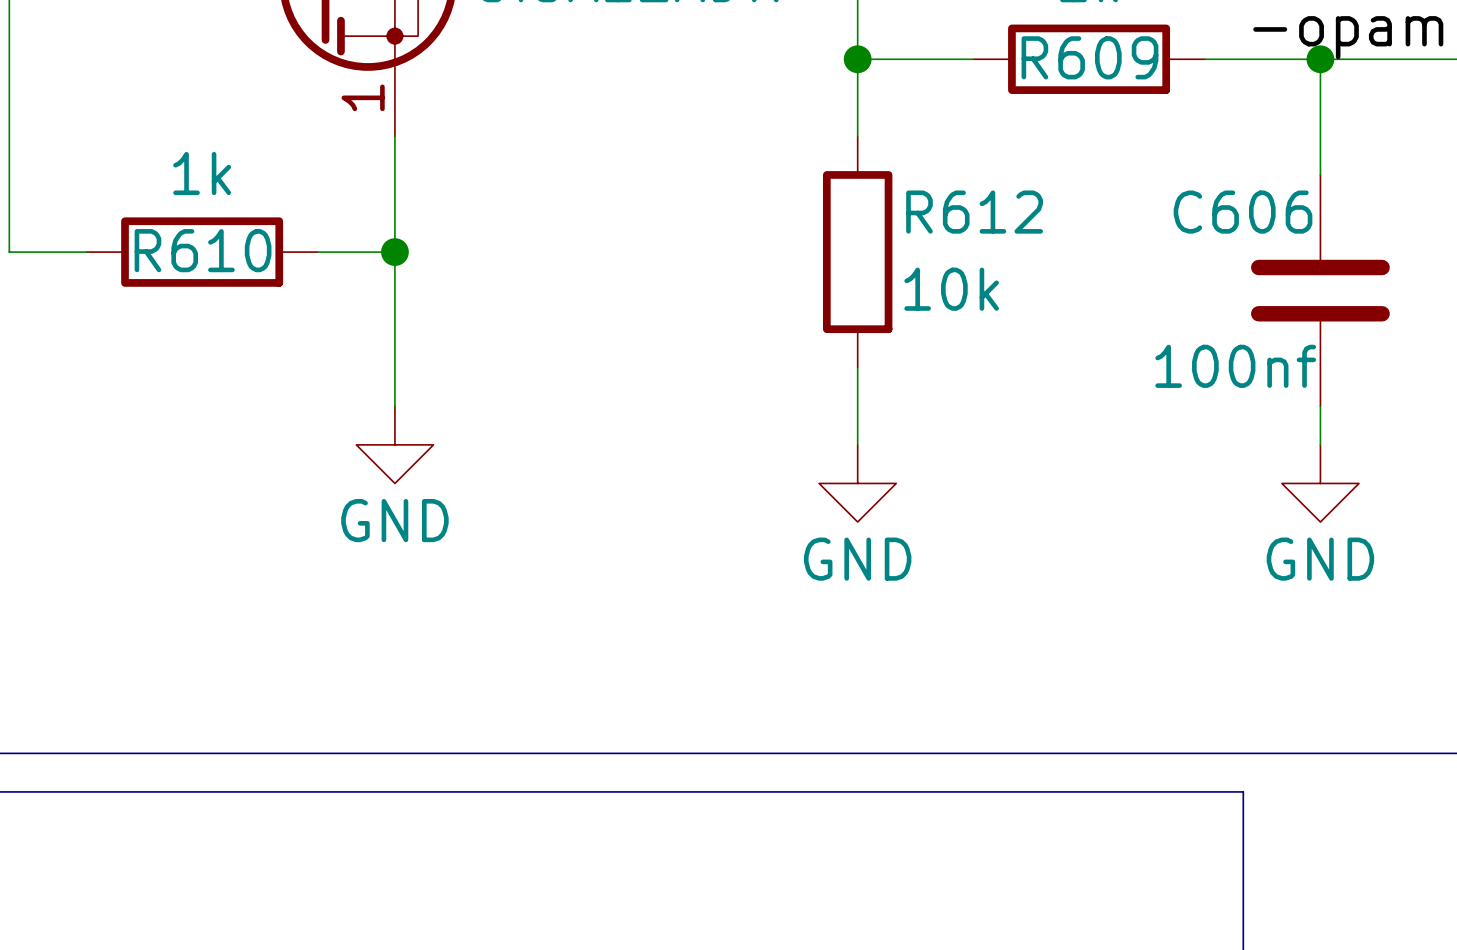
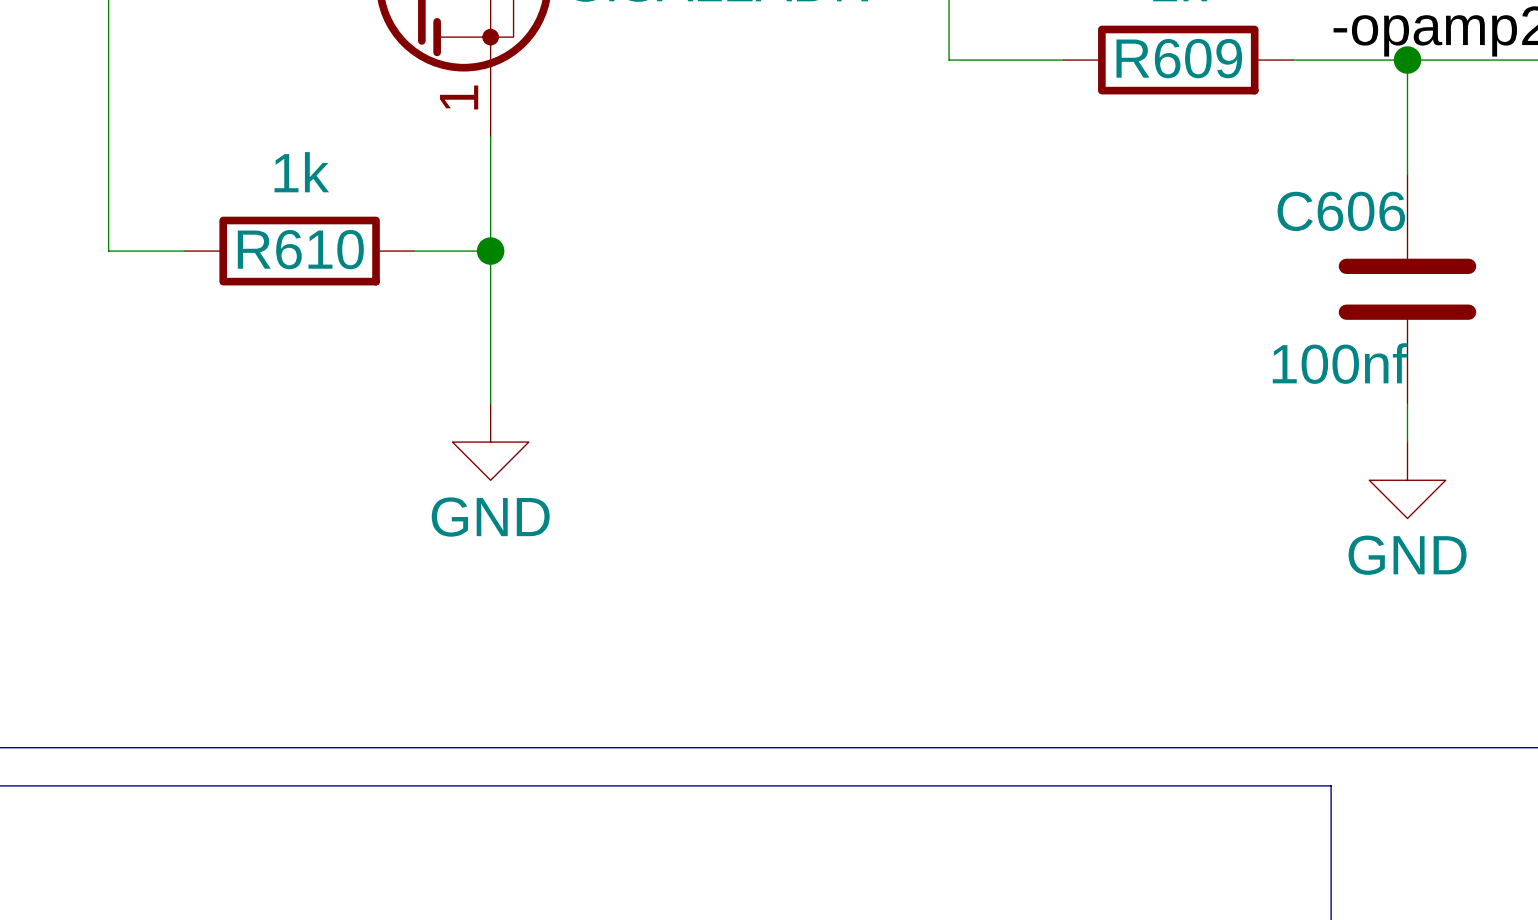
wire: (857, 59) (857, 136) -> none
junction: (857, 59) -> none
R612: 10k (857, 252) -> none
wire: (857, 367) (857, 444) -> none
power symbol: GND (857, 483) -> none

